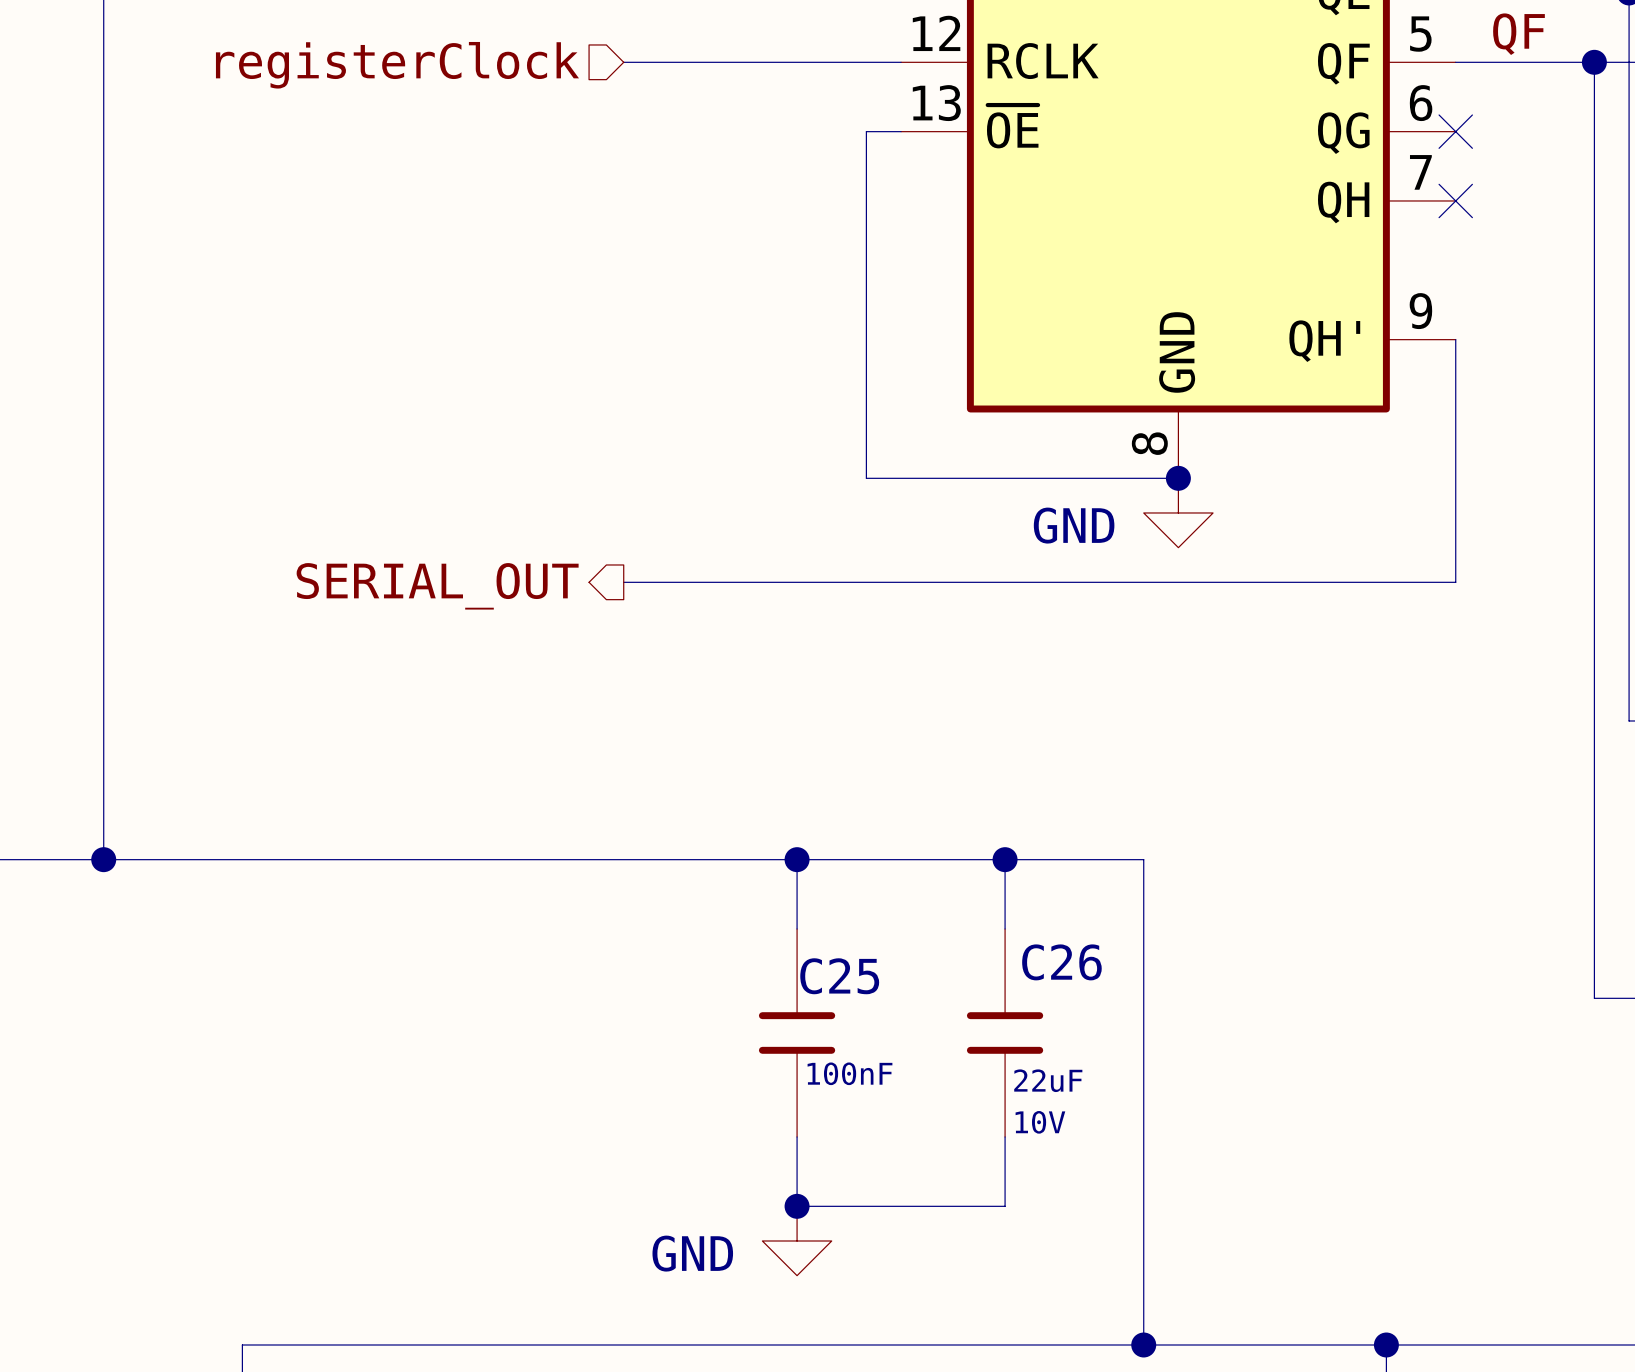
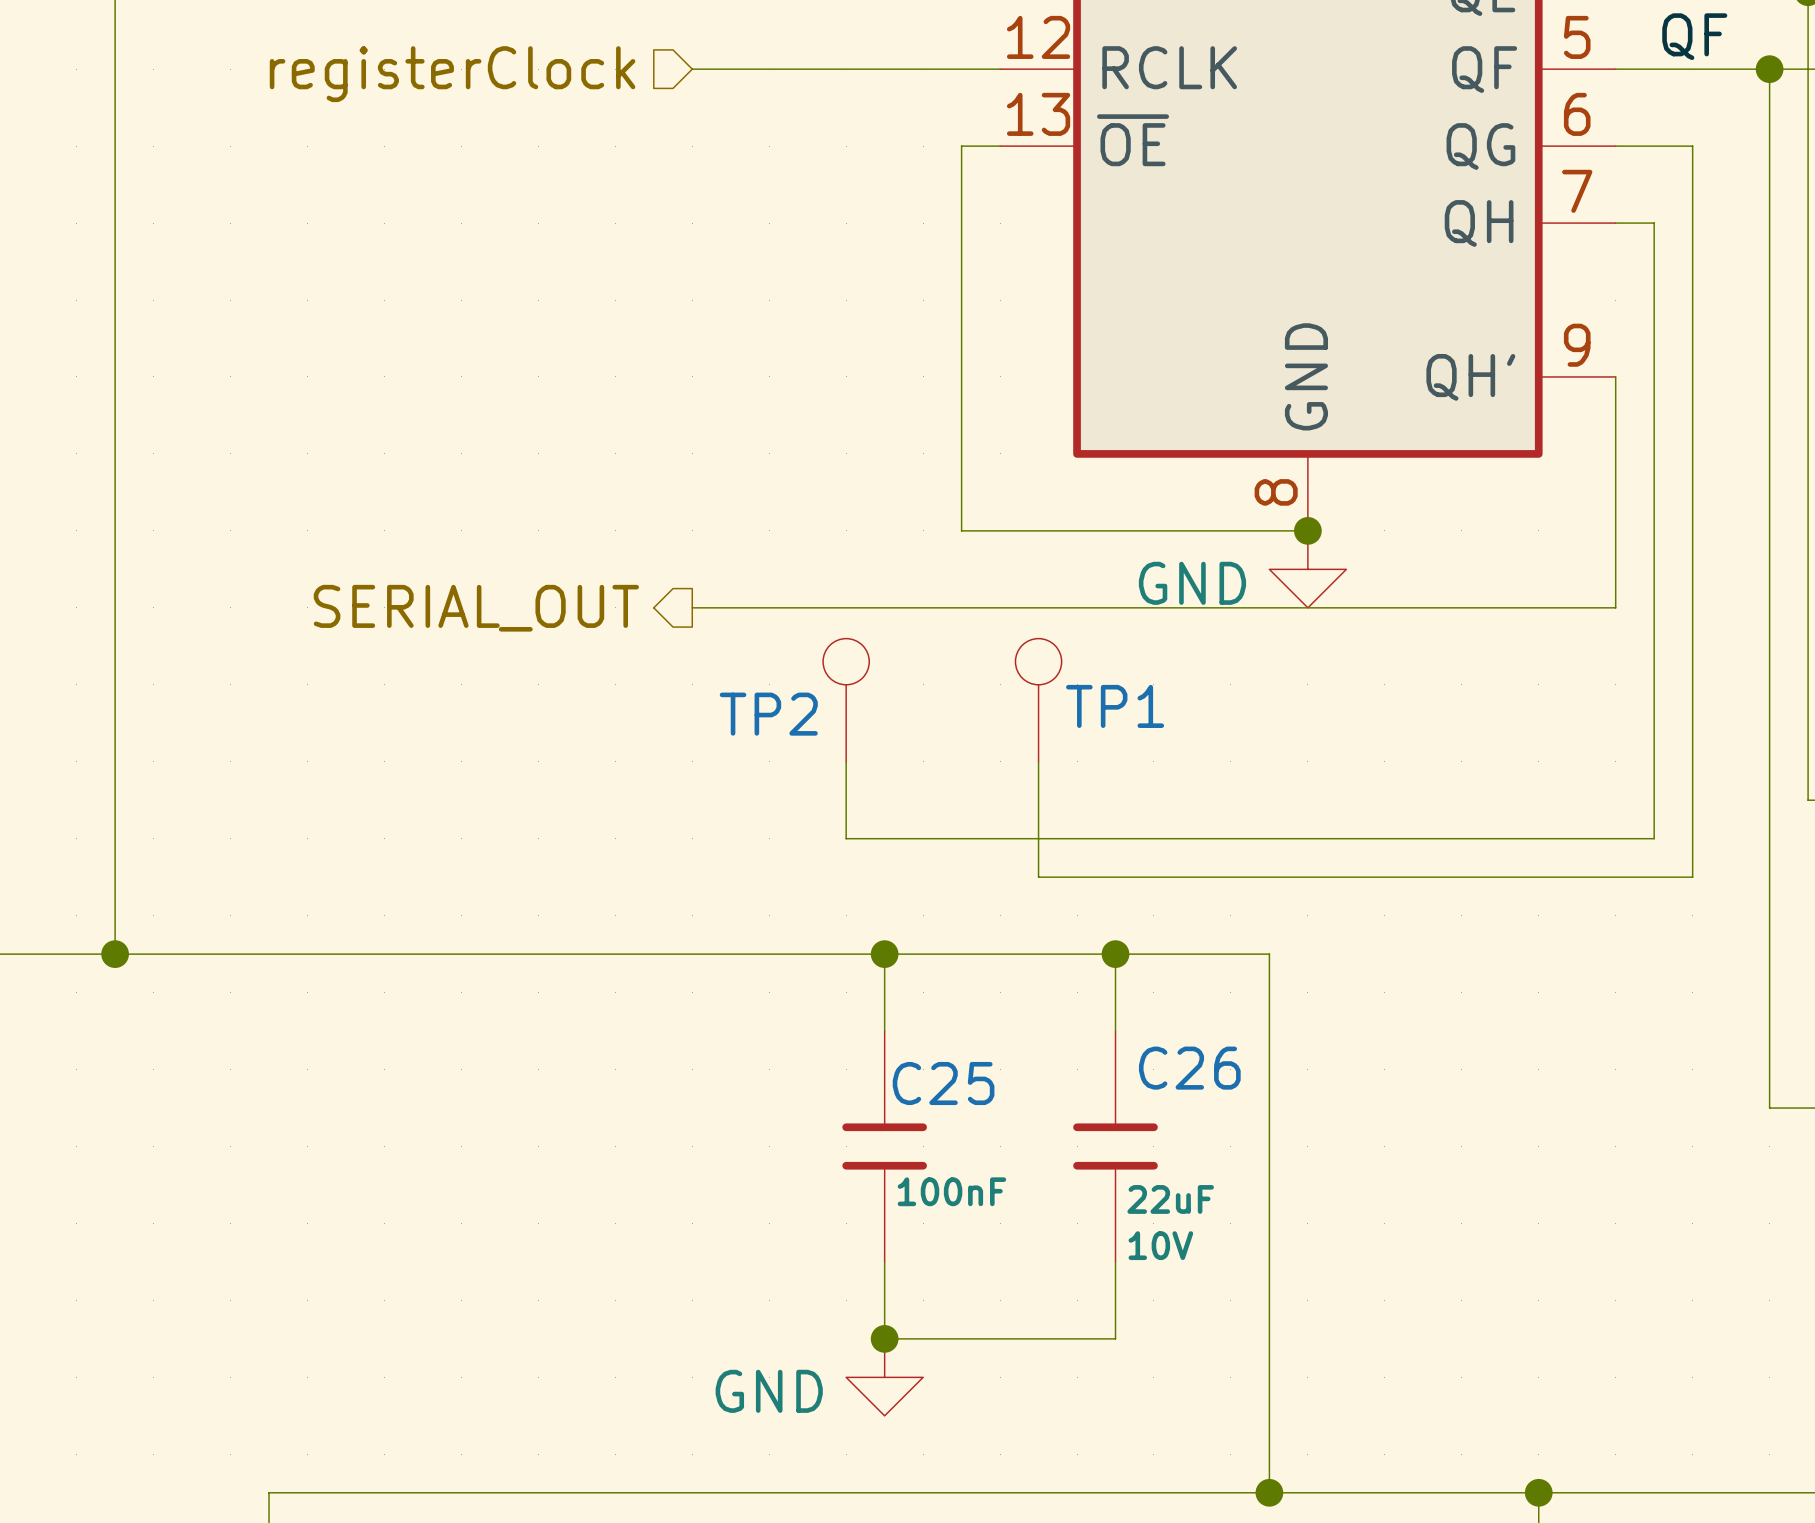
wire: none -> (1615, 146) (1692, 146) (1692, 877) (1038, 877) (1038, 761)
no-connect mark: (1455, 131) -> none
wire: none -> (1615, 223) (1654, 223) (1654, 838) (846, 838) (846, 761)
no-connect mark: (1455, 200) -> none
wire: (1455, 547) (1455, 582) (623, 582) -> (1615, 607) (692, 607)
hierarchical label position: SERIAL_OUT (437, 586) -> SERIAL_OUT (476, 608)
TP2: none -> (846, 700)
TP1: none -> (1038, 700)

